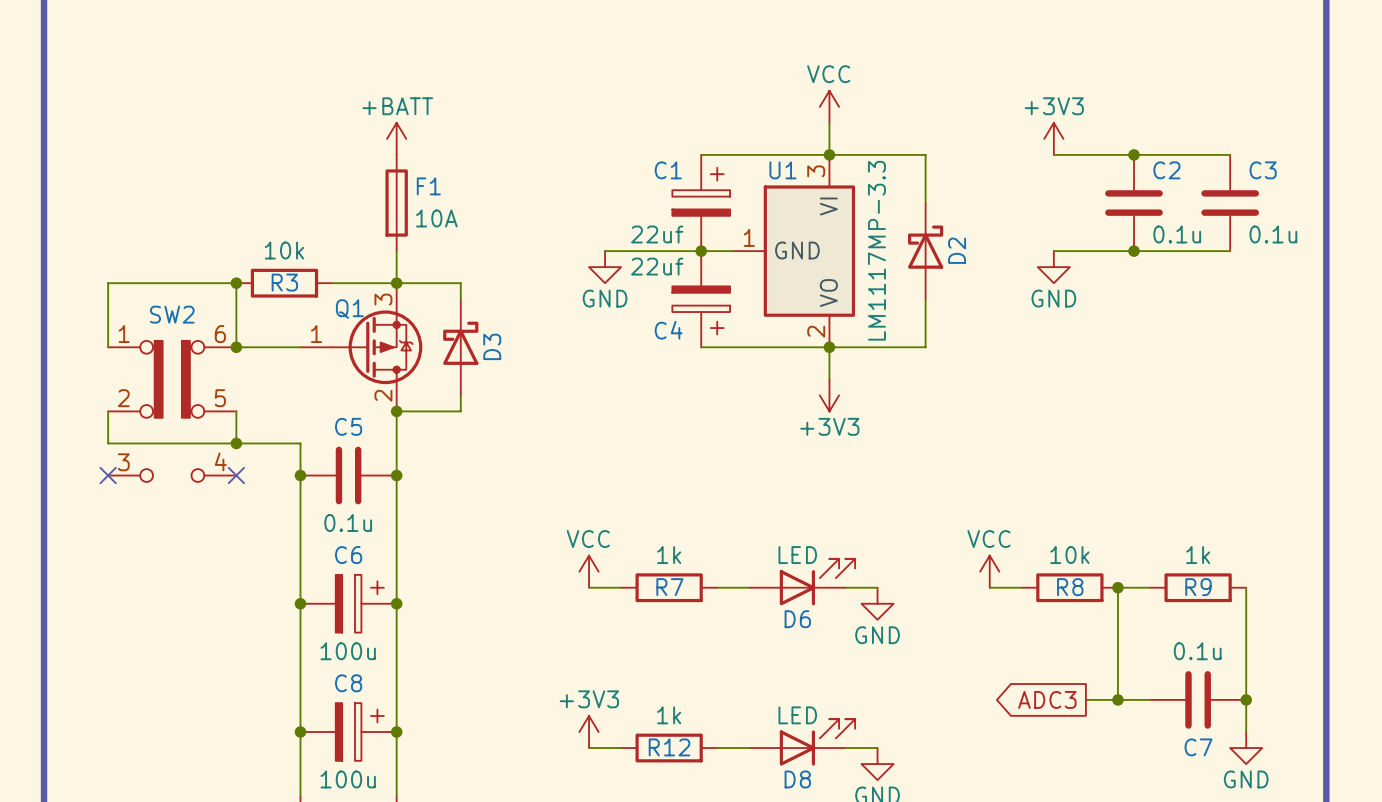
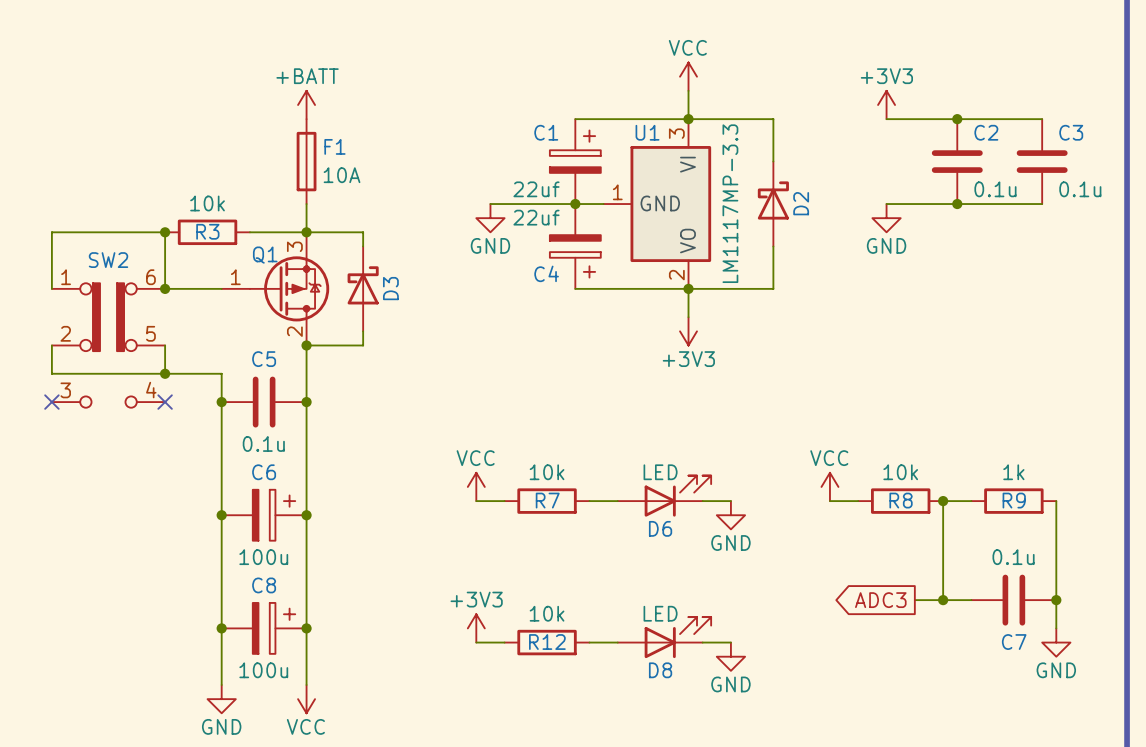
R7 value: 1k (669, 555) -> 10k (547, 472)
R12 value: 1k (669, 715) -> 10k (547, 613)

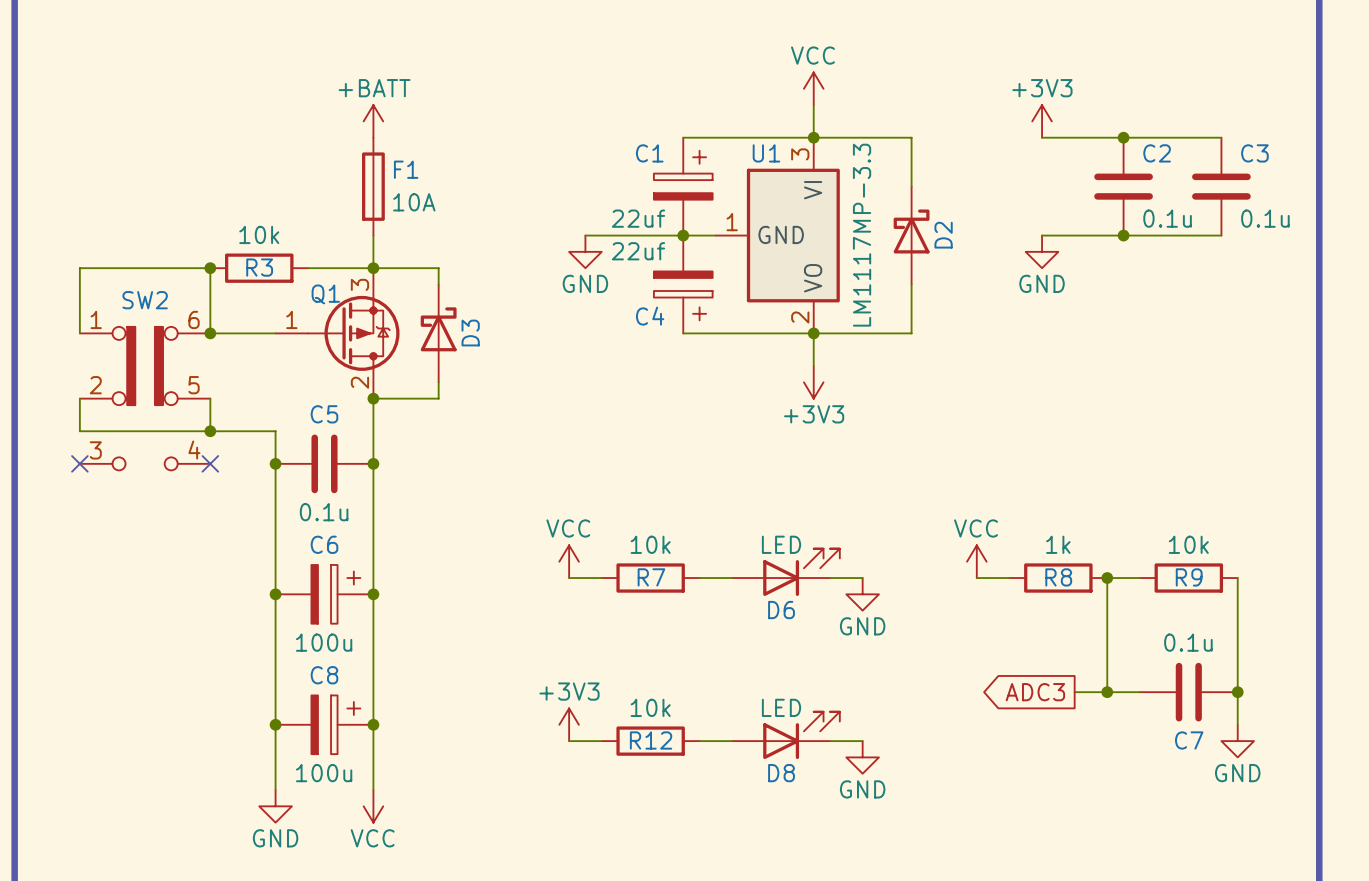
R8 value: 10k (900, 472) -> 1k (1058, 544)
R9 value: 1k (1013, 472) -> 10k (1188, 544)

